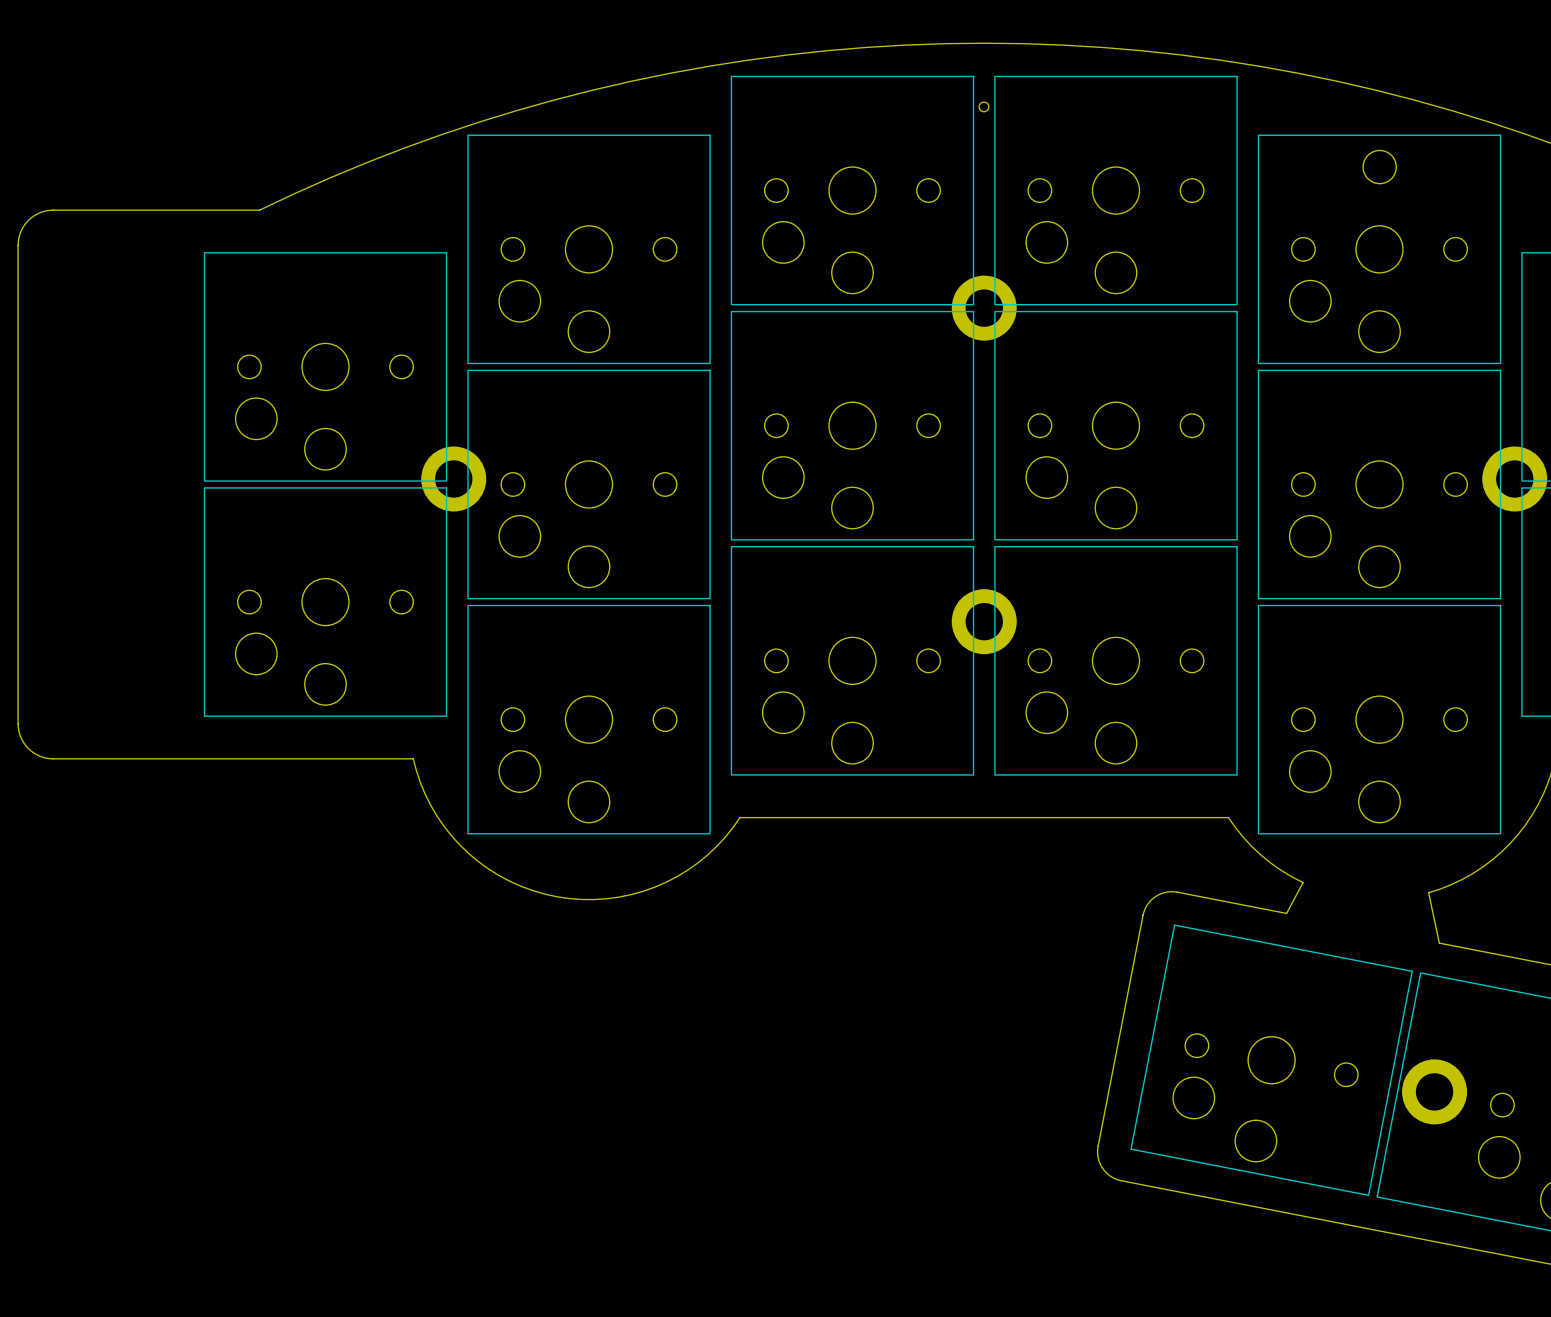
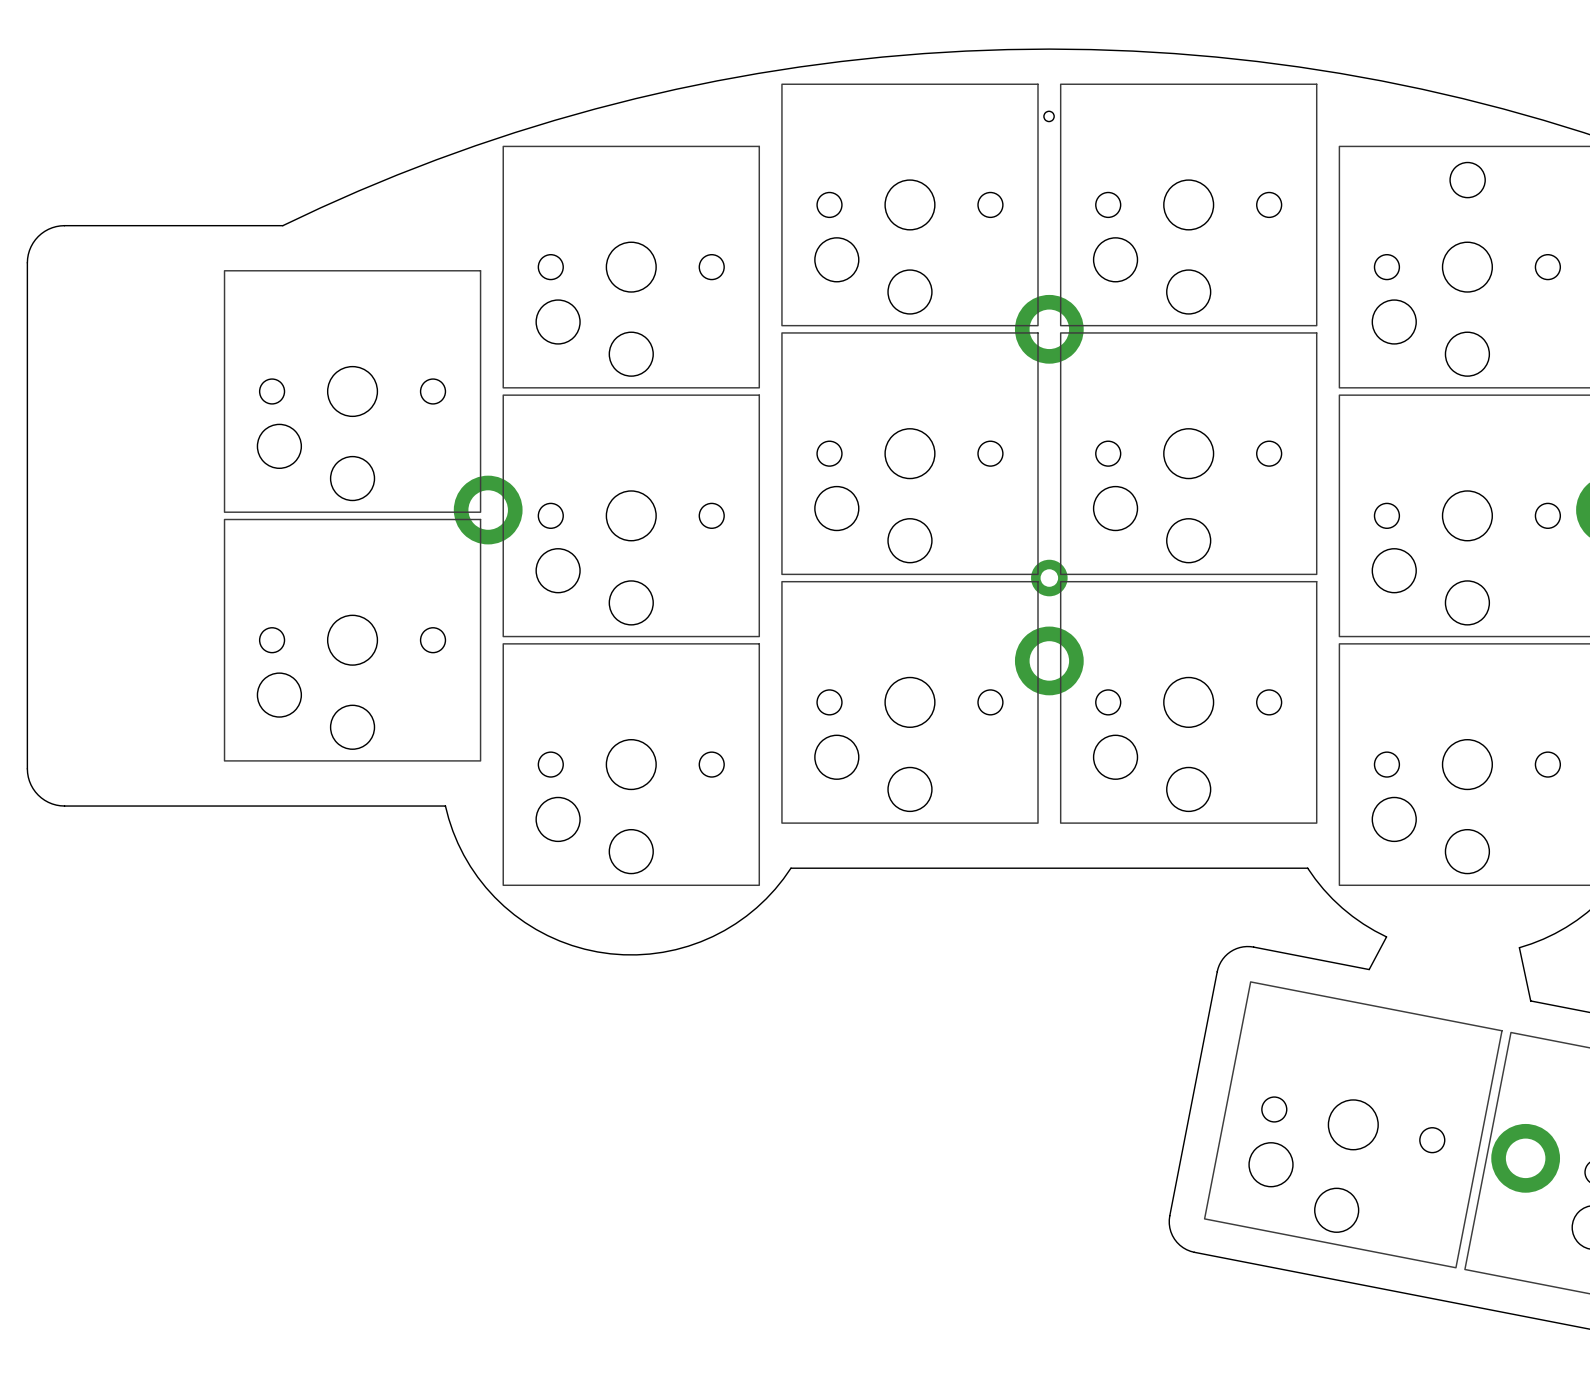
part: none -> (1049, 578)

